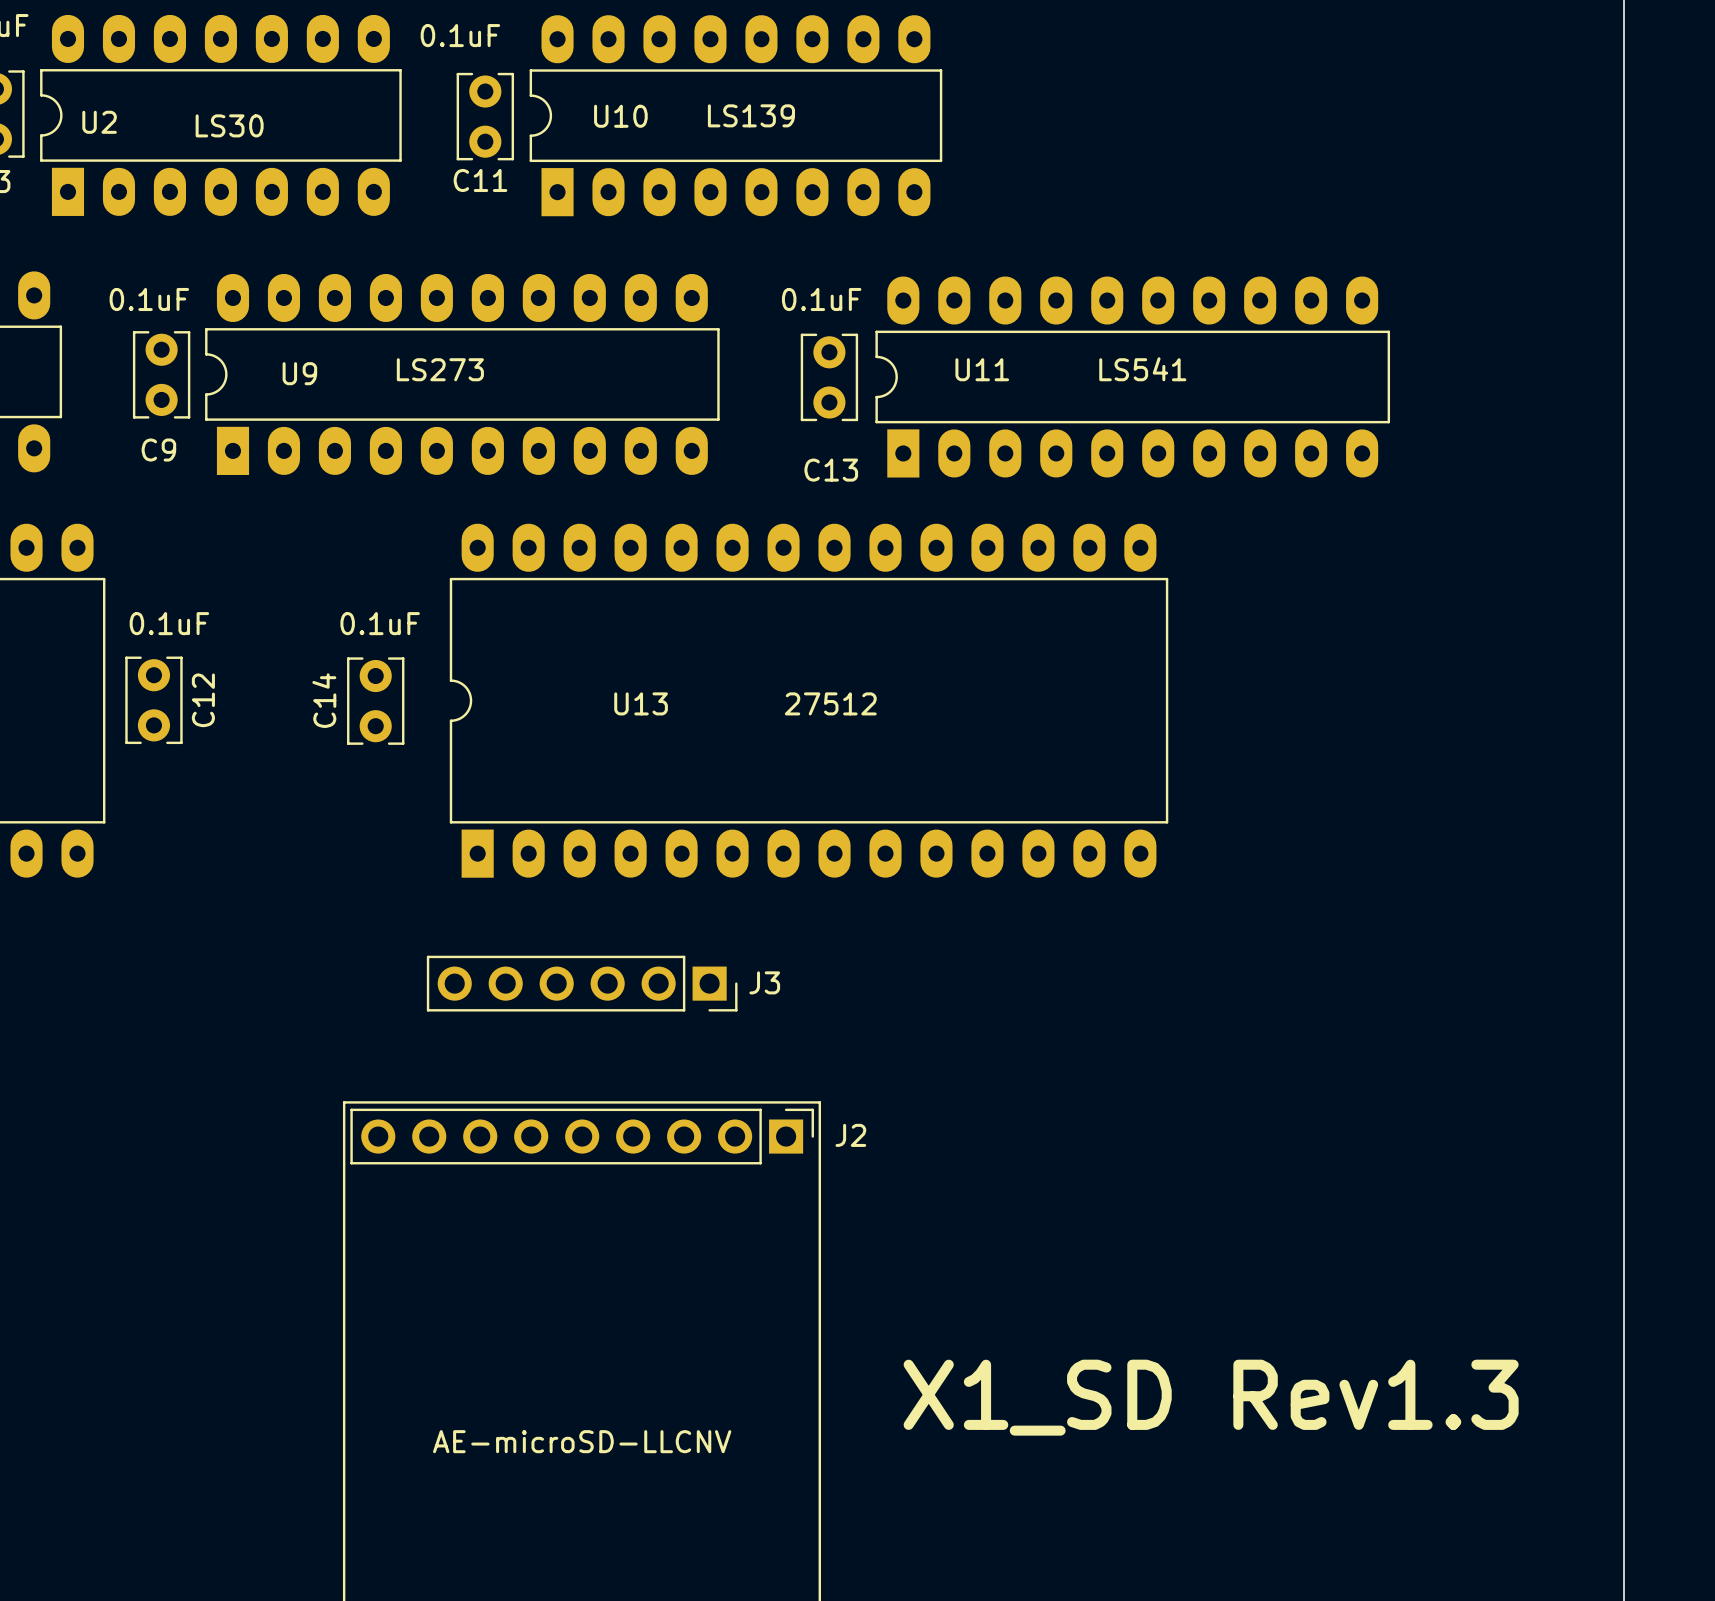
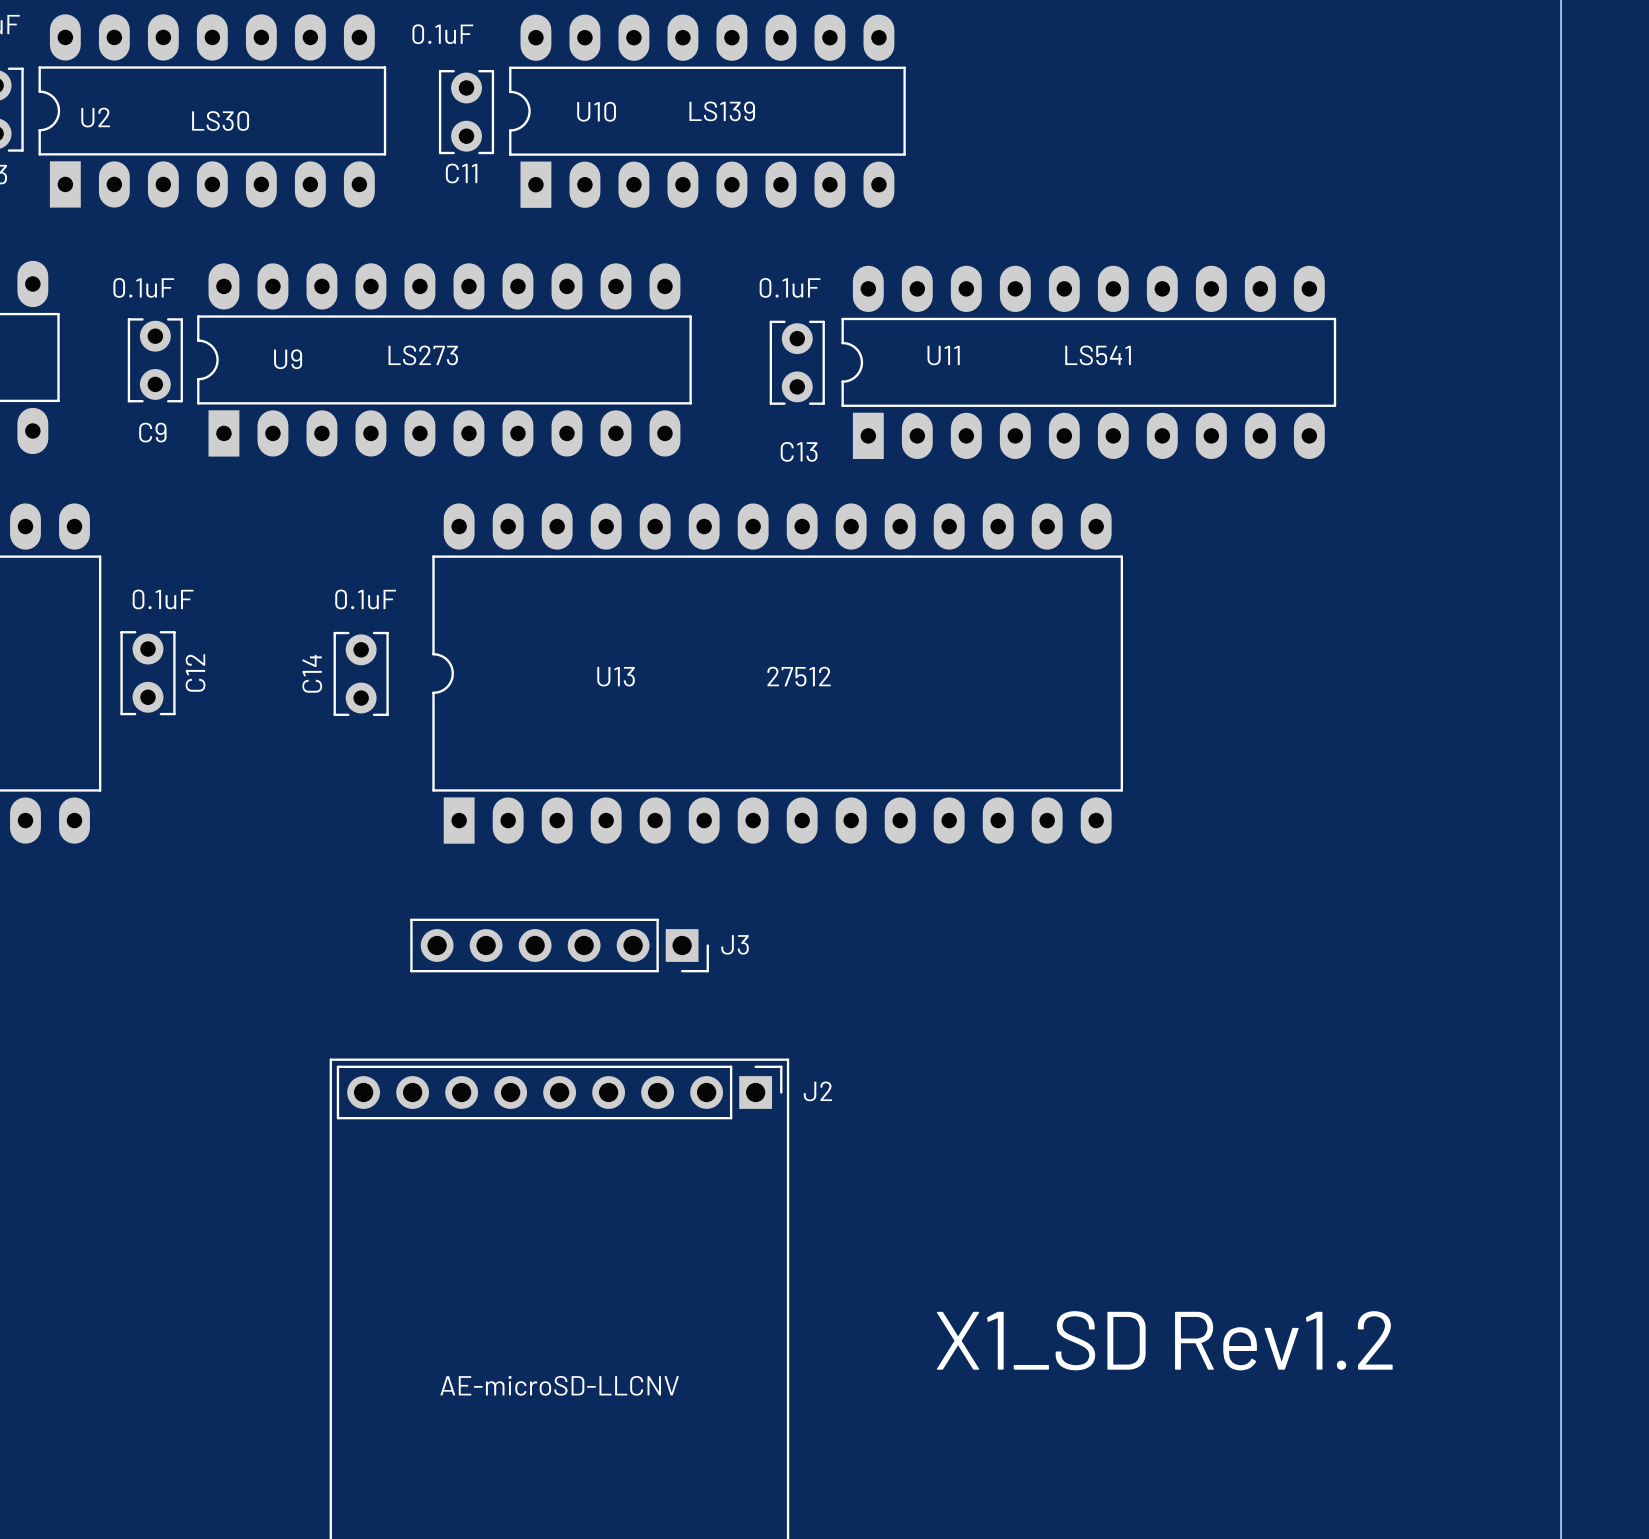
text: X1_SD Rev1.3 (1211, 1397) -> X1_SD Rev1.2 (1164, 1340)

